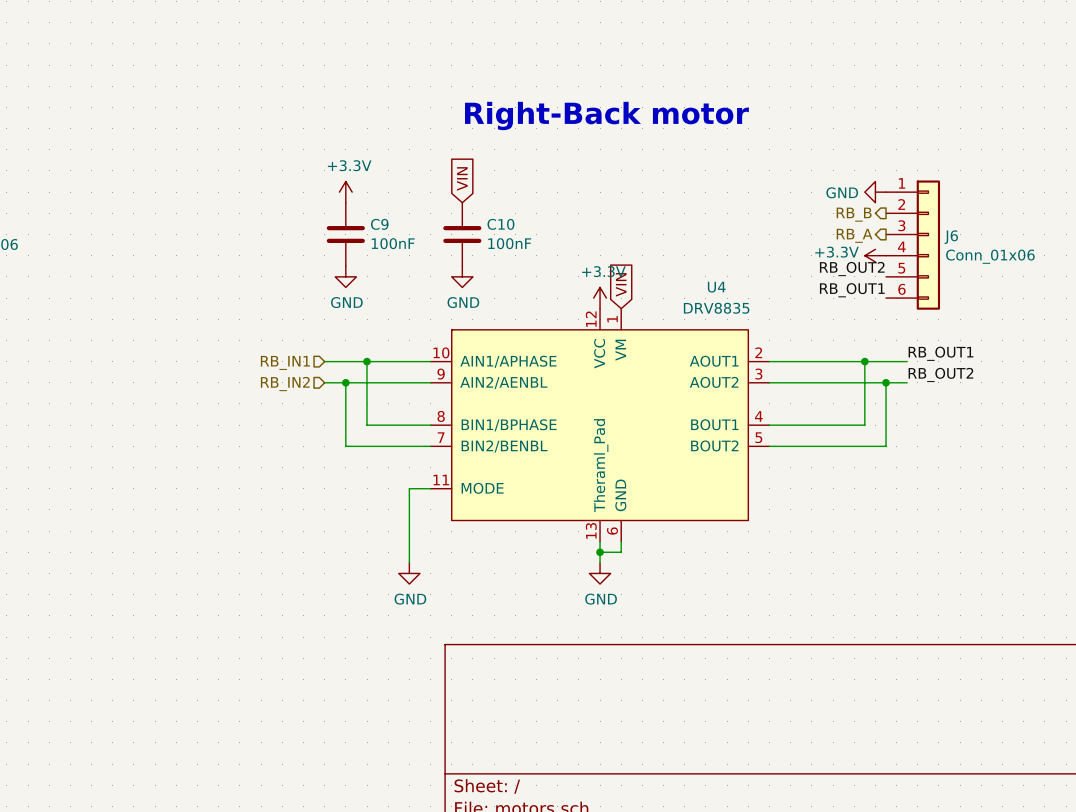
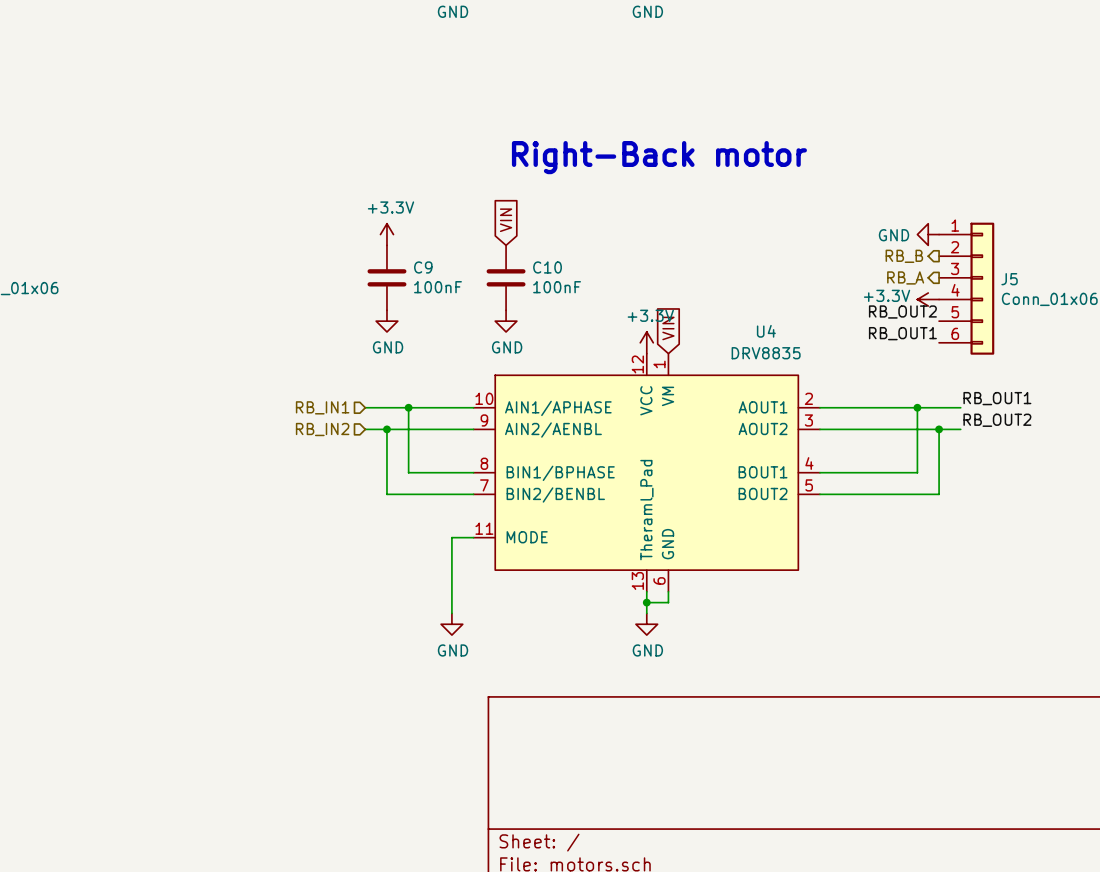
J6 name: J6 (951, 237) -> J5 (1009, 279)

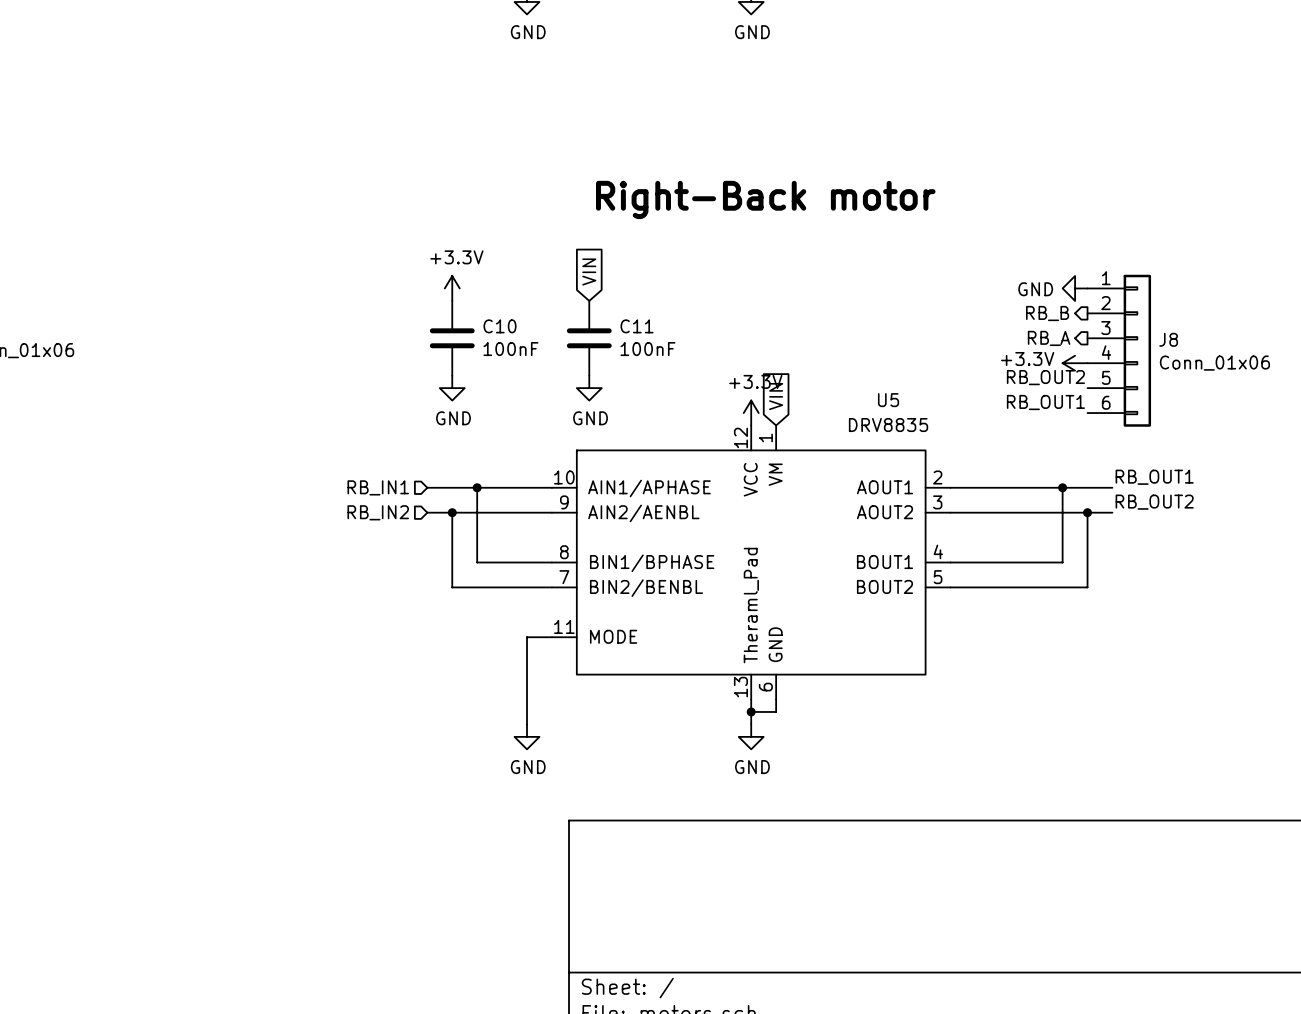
C9 name: C9 (423, 267) -> C10 (499, 326)
C10 name: C10 (547, 267) -> C11 (637, 326)
J5 name: J5 (1009, 279) -> J8 (1168, 339)
U4 name: U4 (766, 331) -> U5 (888, 400)

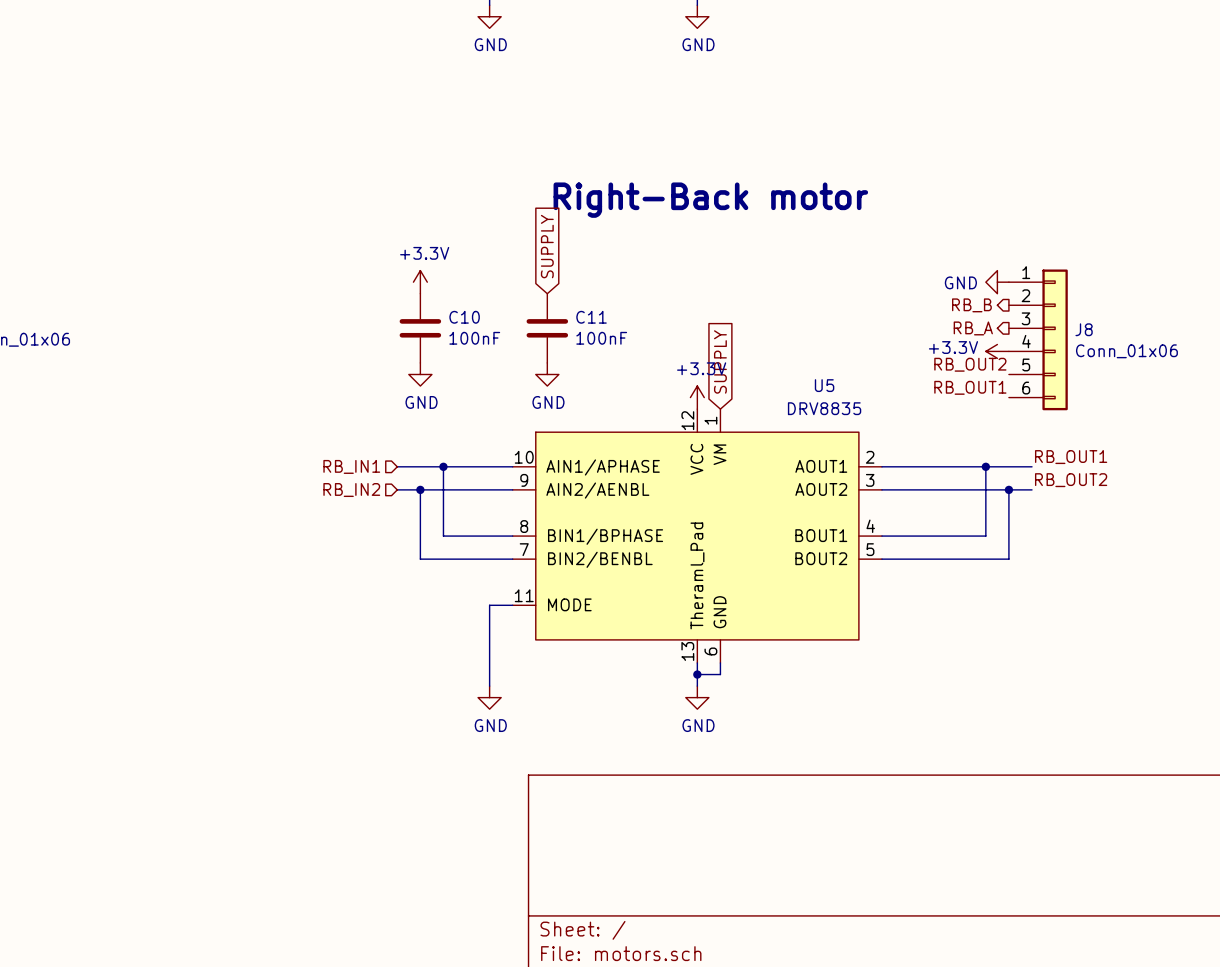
global label: VIN (589, 271) -> SUPPLY (547, 246)
global label: VIN (776, 396) -> SUPPLY (720, 361)

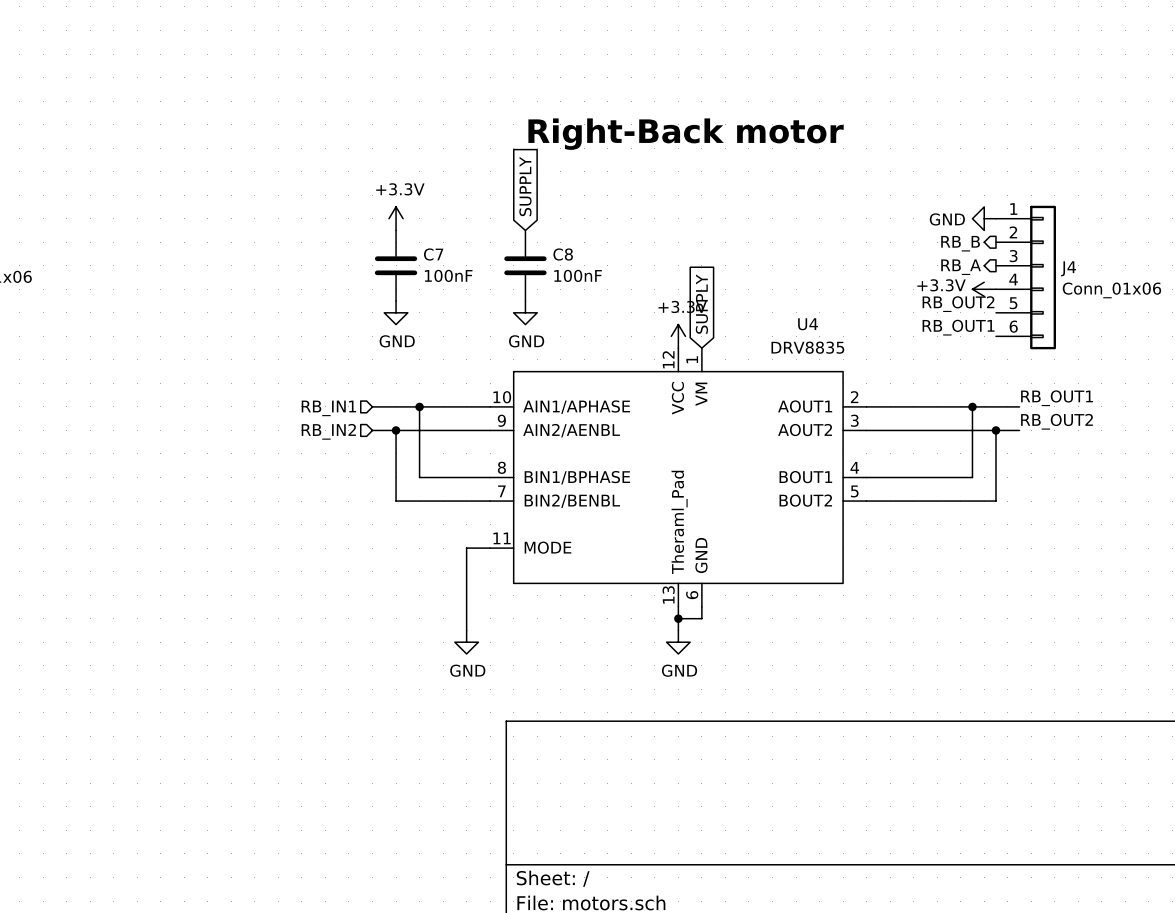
C10 name: C10 (464, 317) -> C7 (433, 254)
C11 name: C11 (591, 317) -> C8 (563, 254)
J8 name: J8 (1084, 329) -> J4 (1068, 268)
U5 name: U5 (824, 385) -> U4 (808, 324)

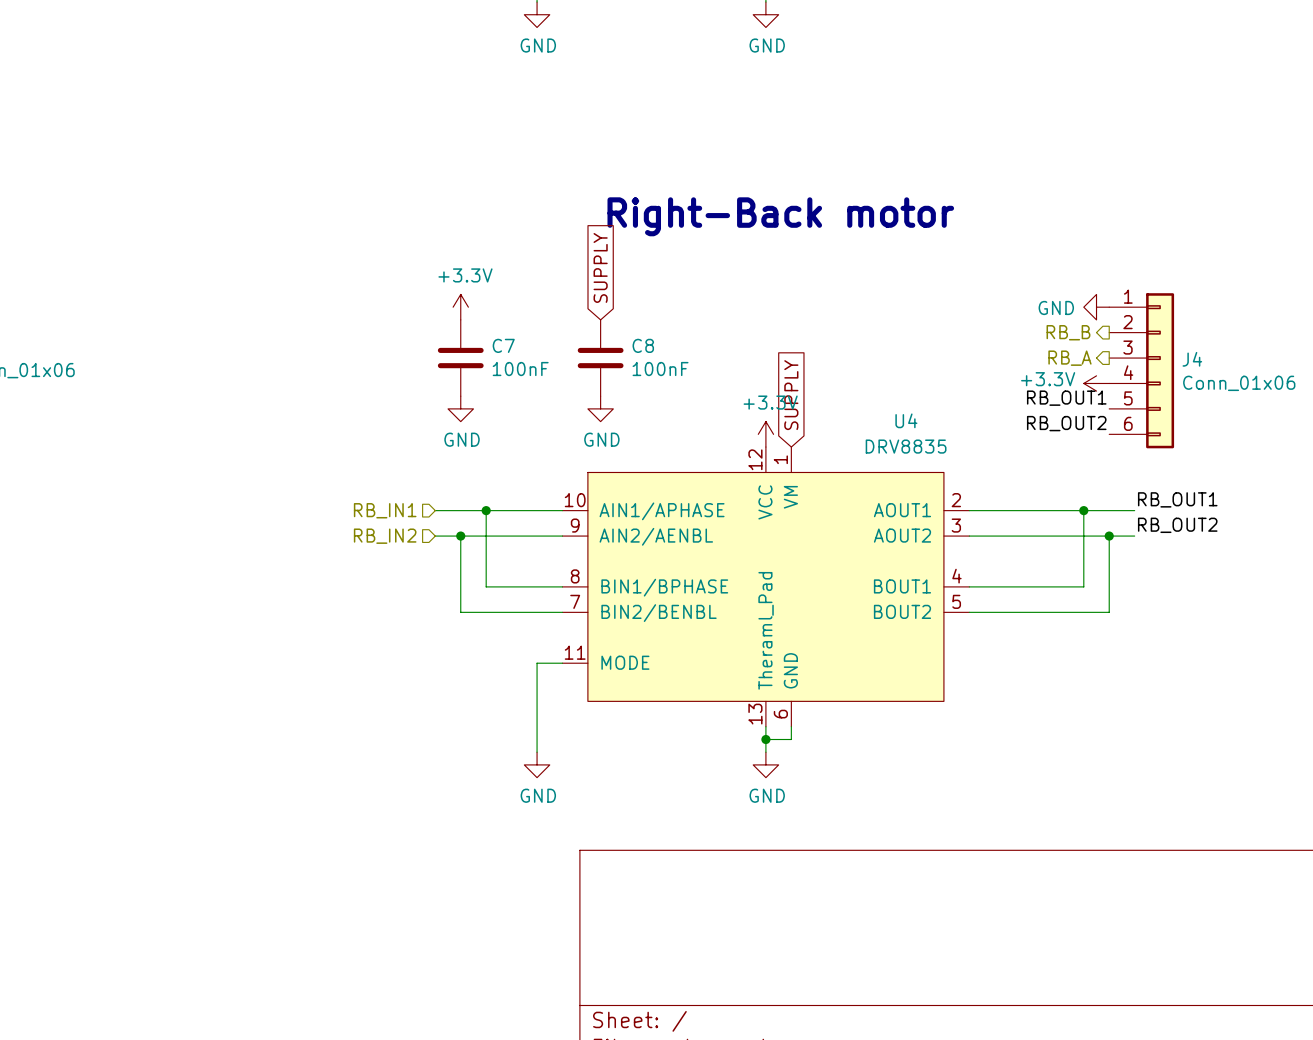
label: RB_OUT2 (958, 304) -> RB_OUT1 (1066, 398)
label: RB_OUT1 (958, 327) -> RB_OUT2 (1066, 423)

